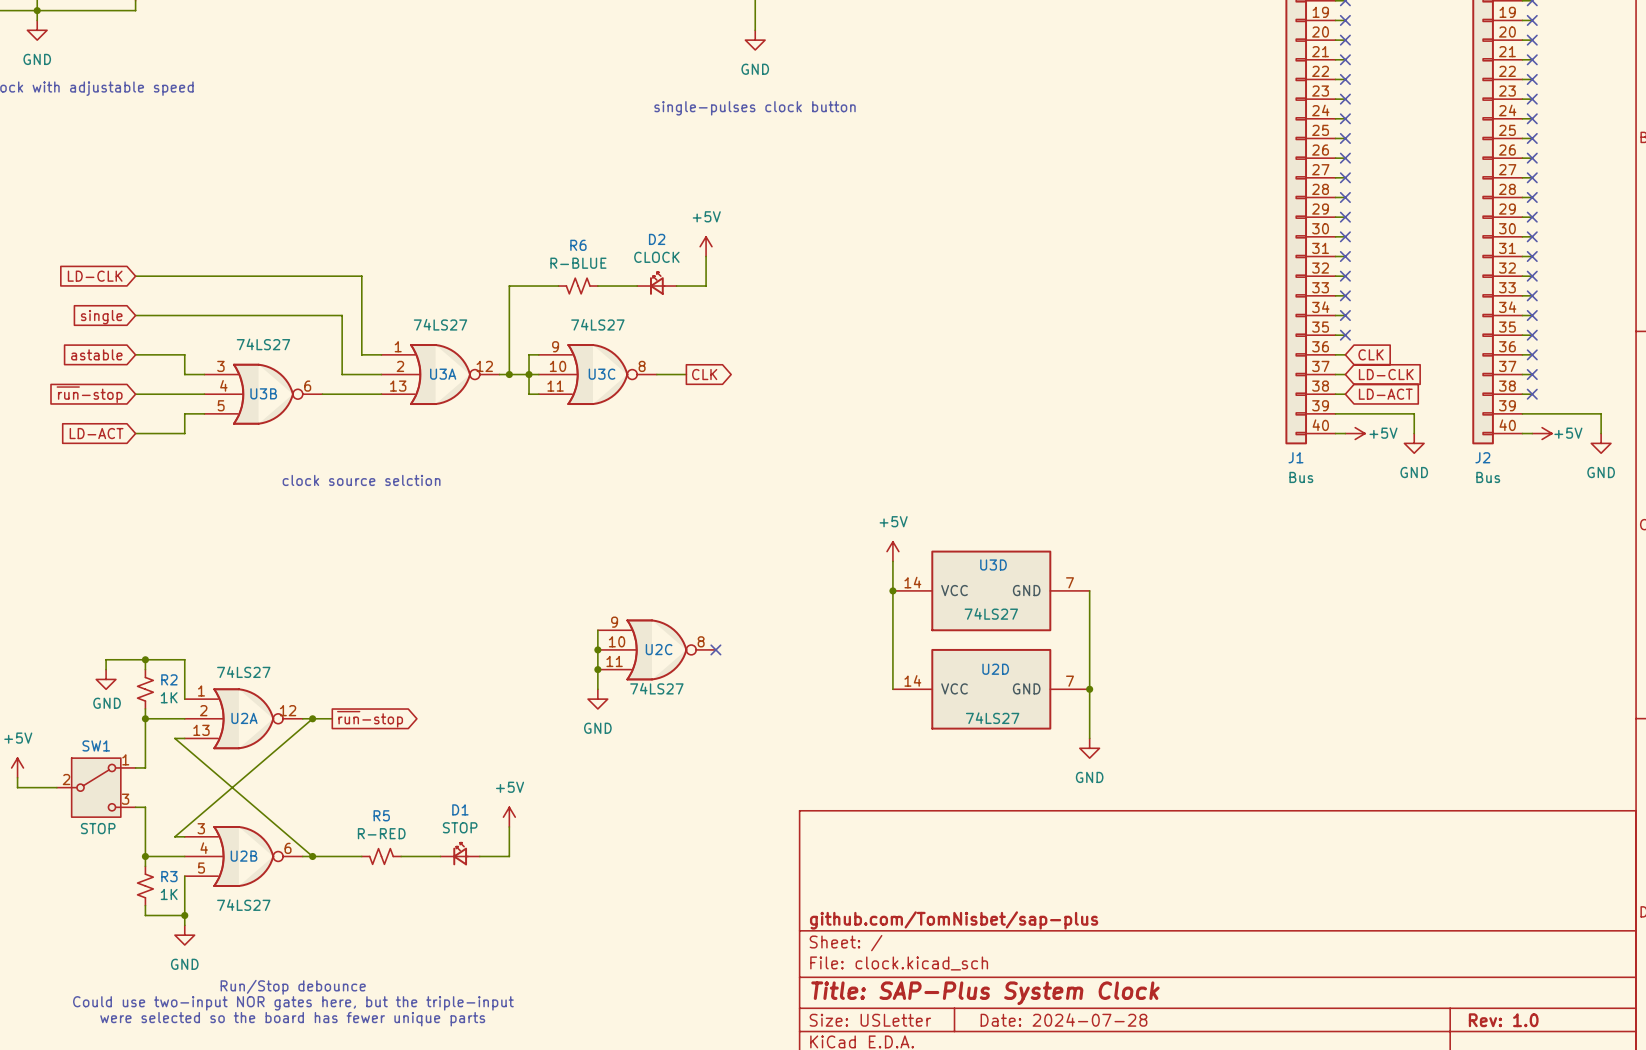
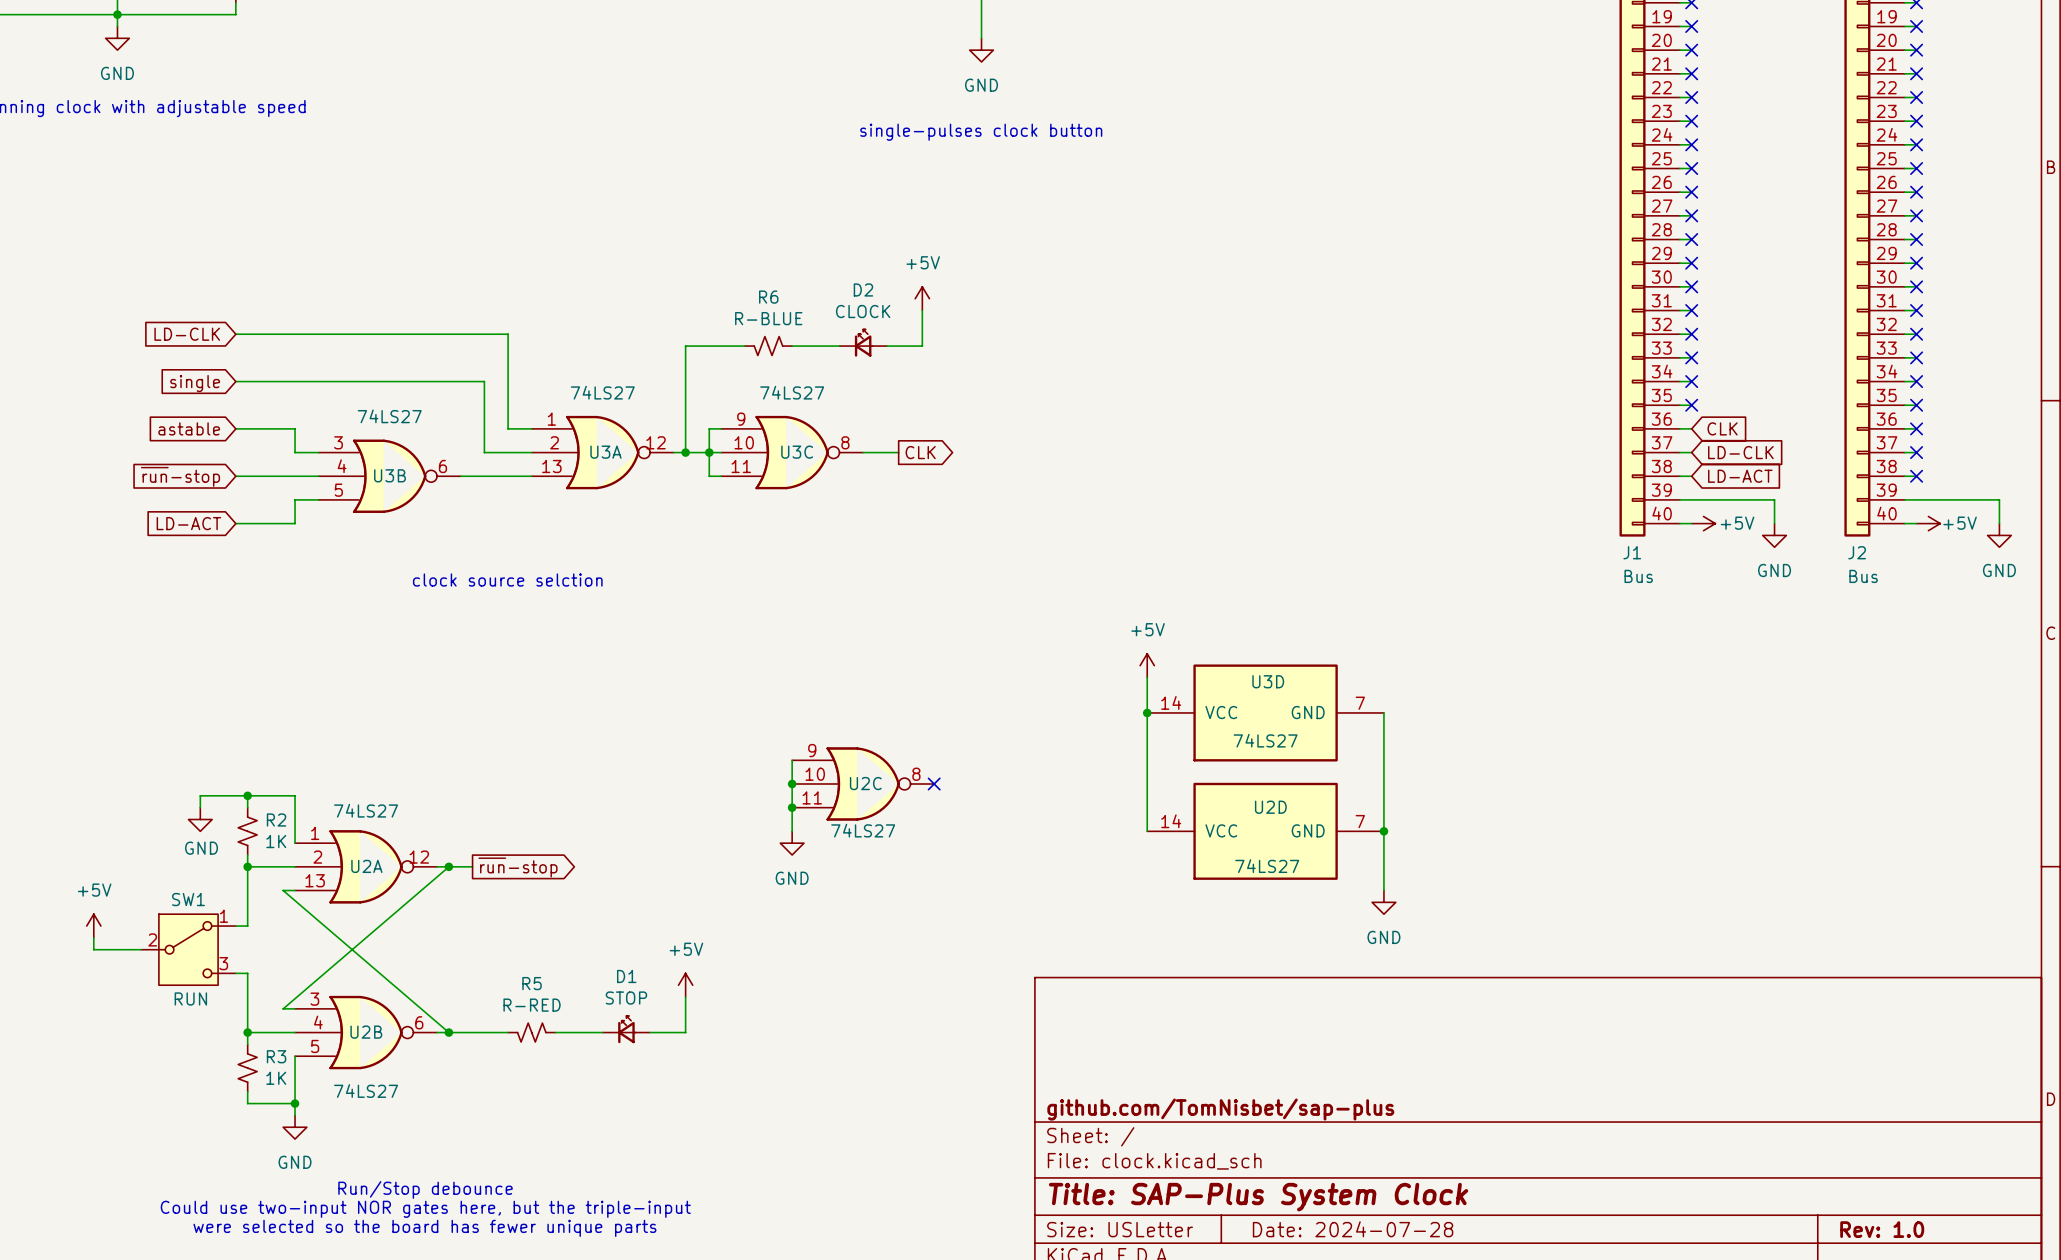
SW1 value: STOP (98, 828) -> RUN (190, 998)

